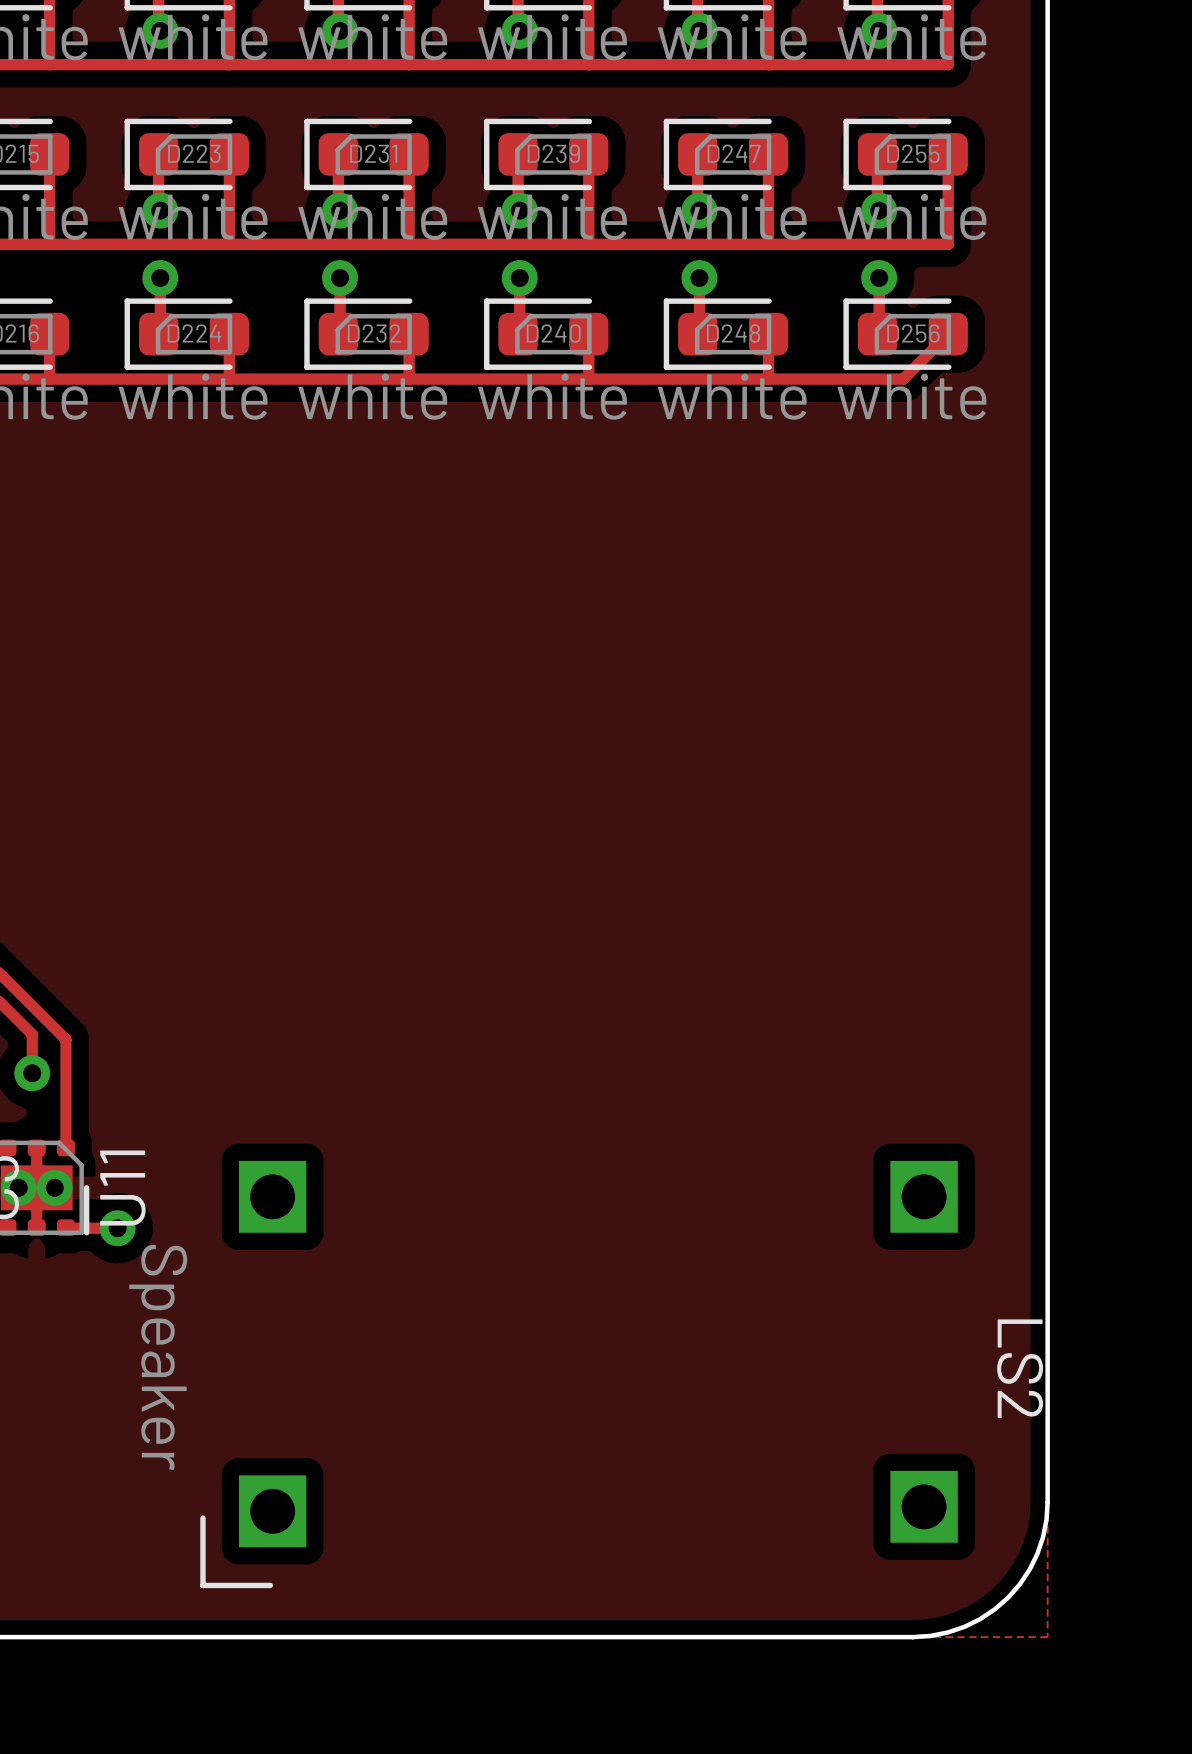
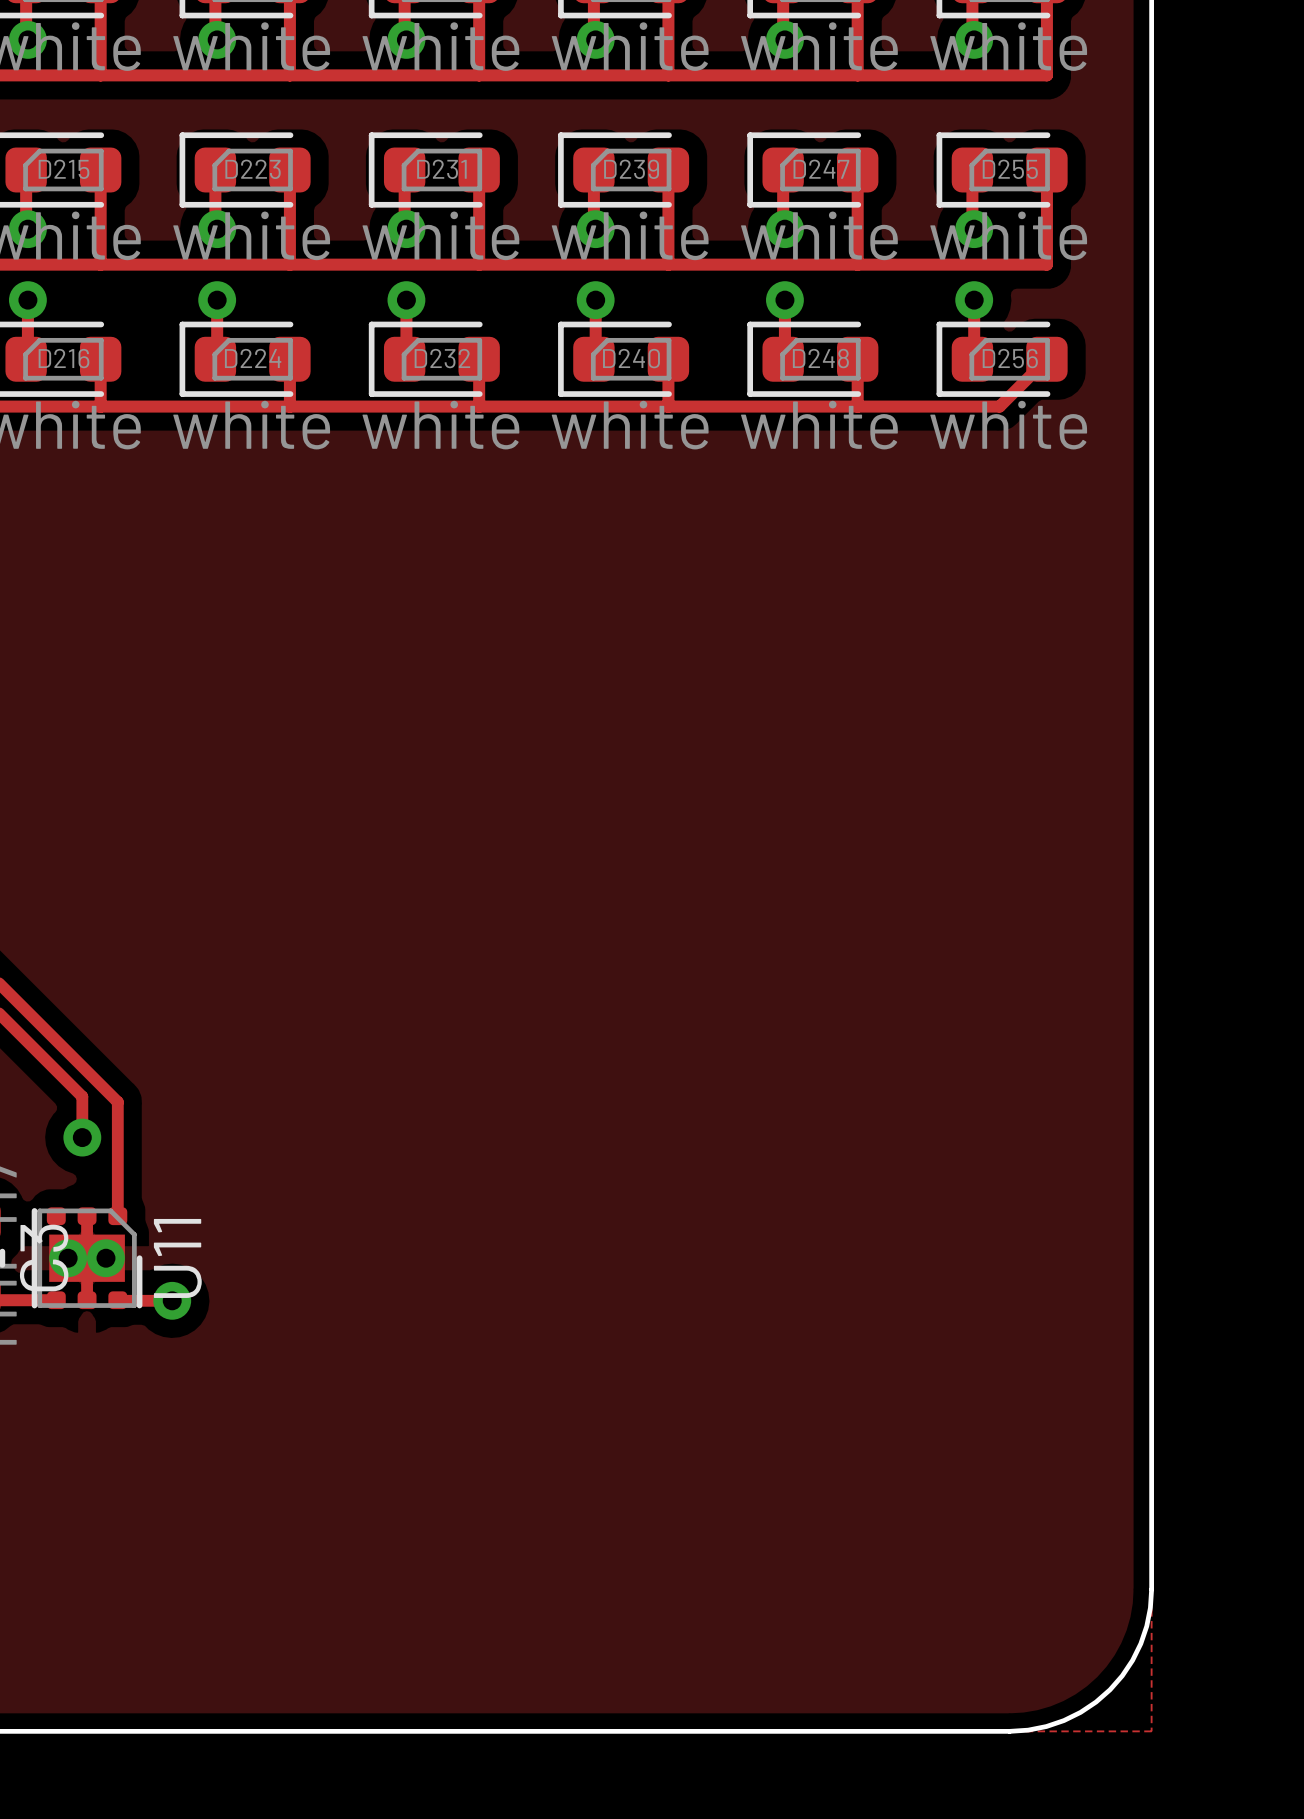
LS2: Speaker (579, 1374) -> none

